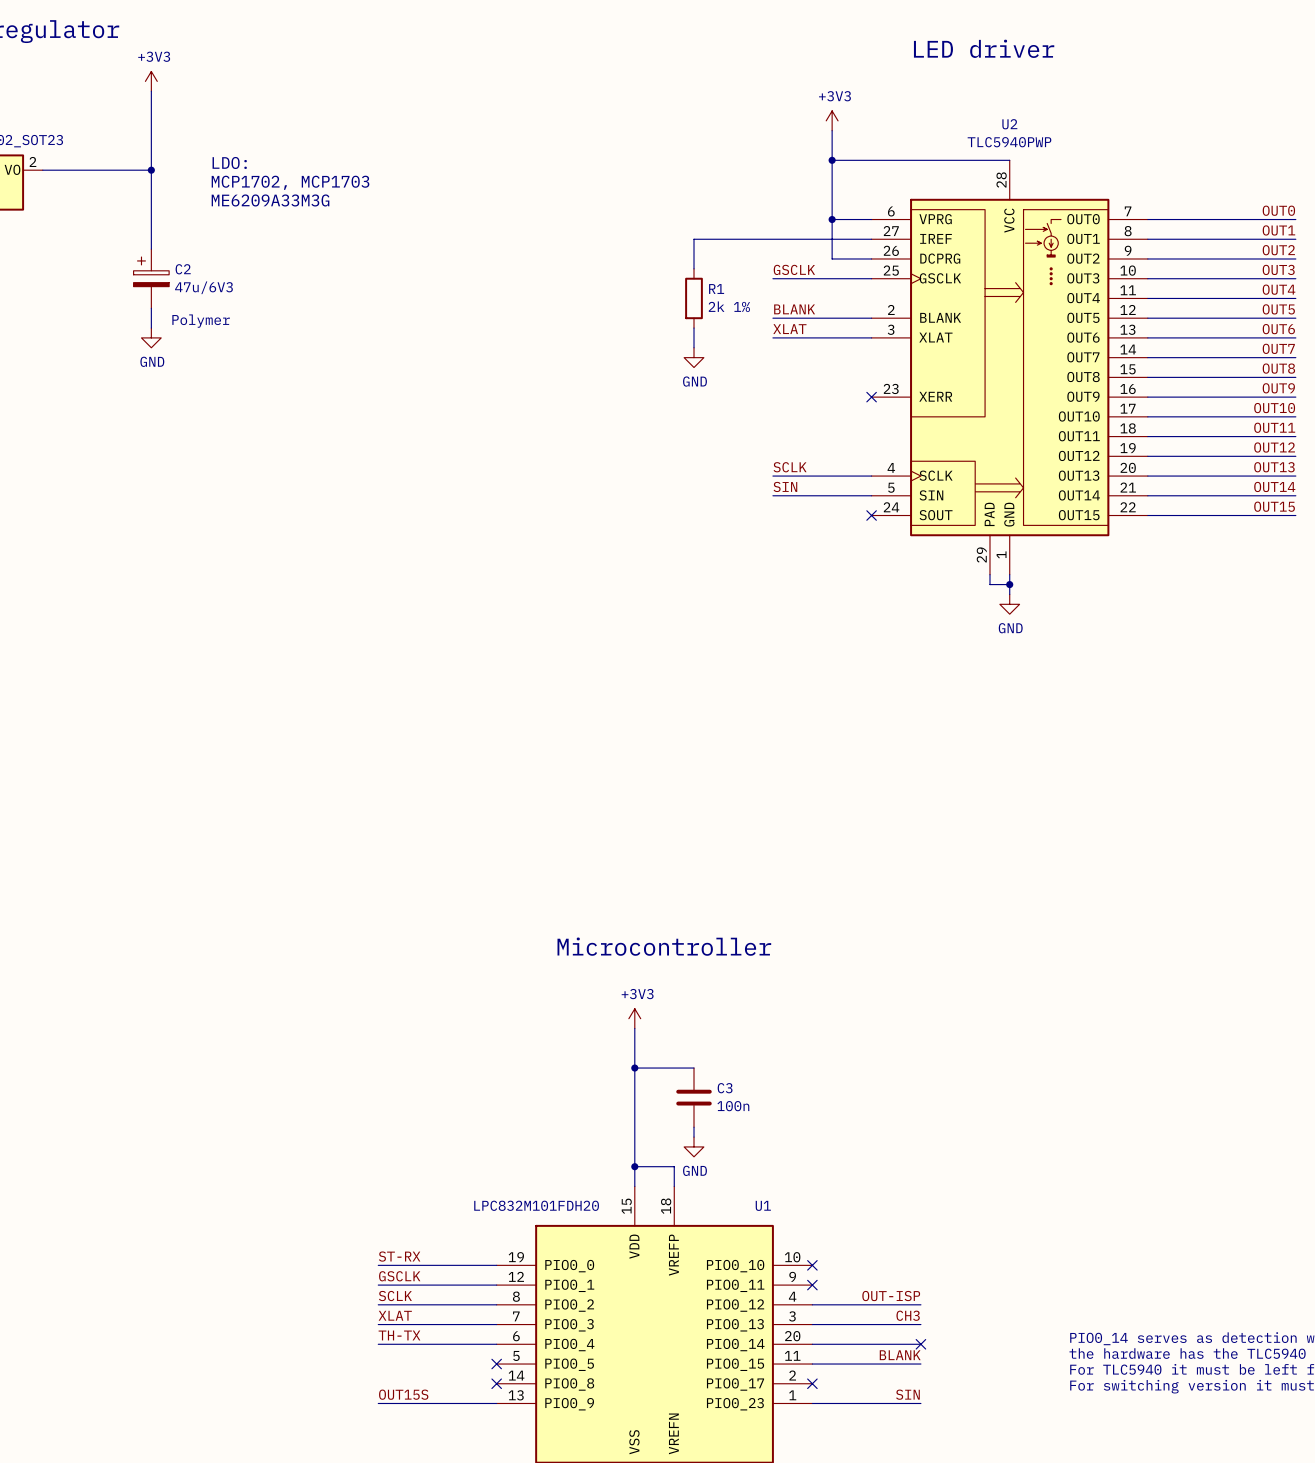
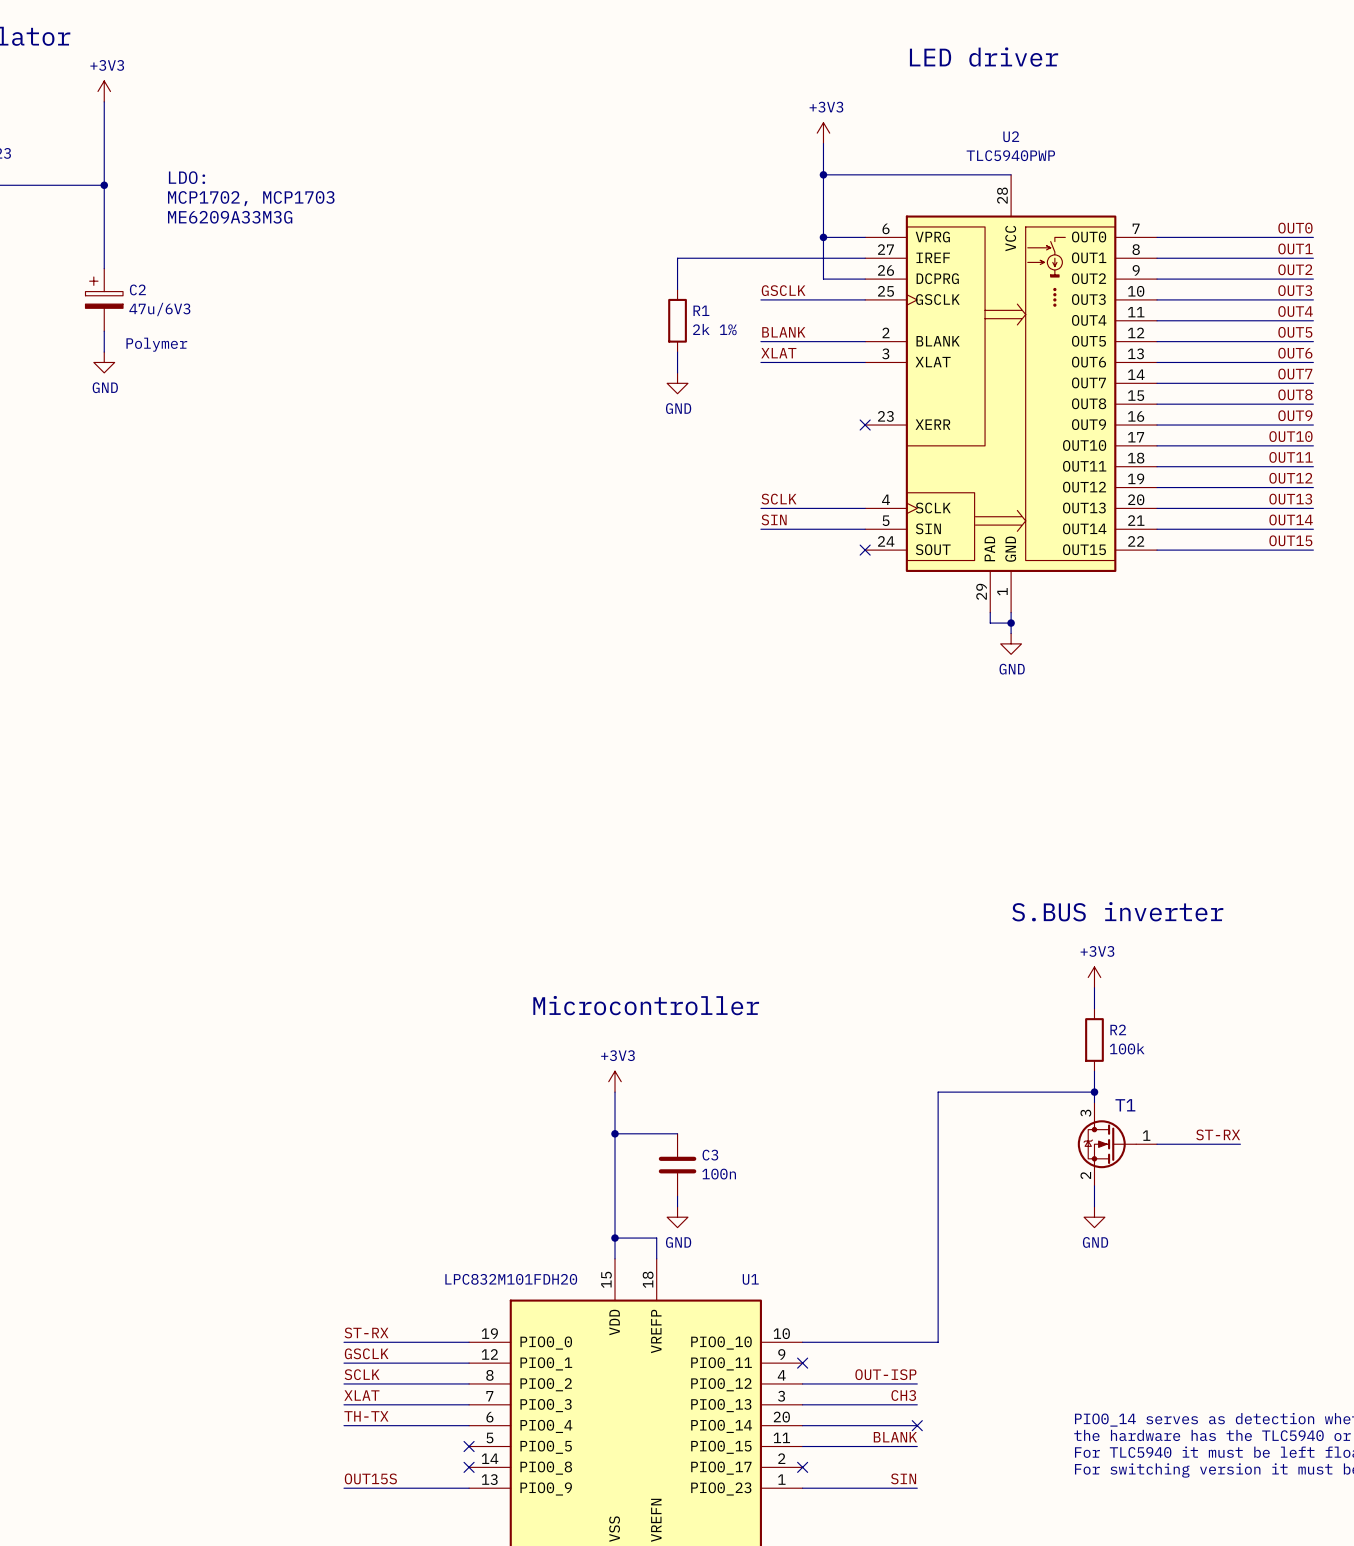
text: none -> S.BUS inverter (1117, 911)
power symbol: none -> +3V3 (1094, 977)
wire: none -> (1094, 987) (1094, 1008)
R2: none -> 100k (1094, 1040)
wire: none -> (1094, 1071) (1094, 1102)
wire: none -> (1094, 1092) (938, 1092) (938, 1342) (802, 1342)
junction: none -> (1094, 1092)
label: none -> ST-RX (1218, 1134)
T1: none -> (1117, 1144)
wire: none -> (1157, 1144) (1240, 1144)
wire: none -> (1094, 1185) (1094, 1206)
power symbol: none -> GND (1094, 1217)
no-connect mark: (812, 1265) -> none

